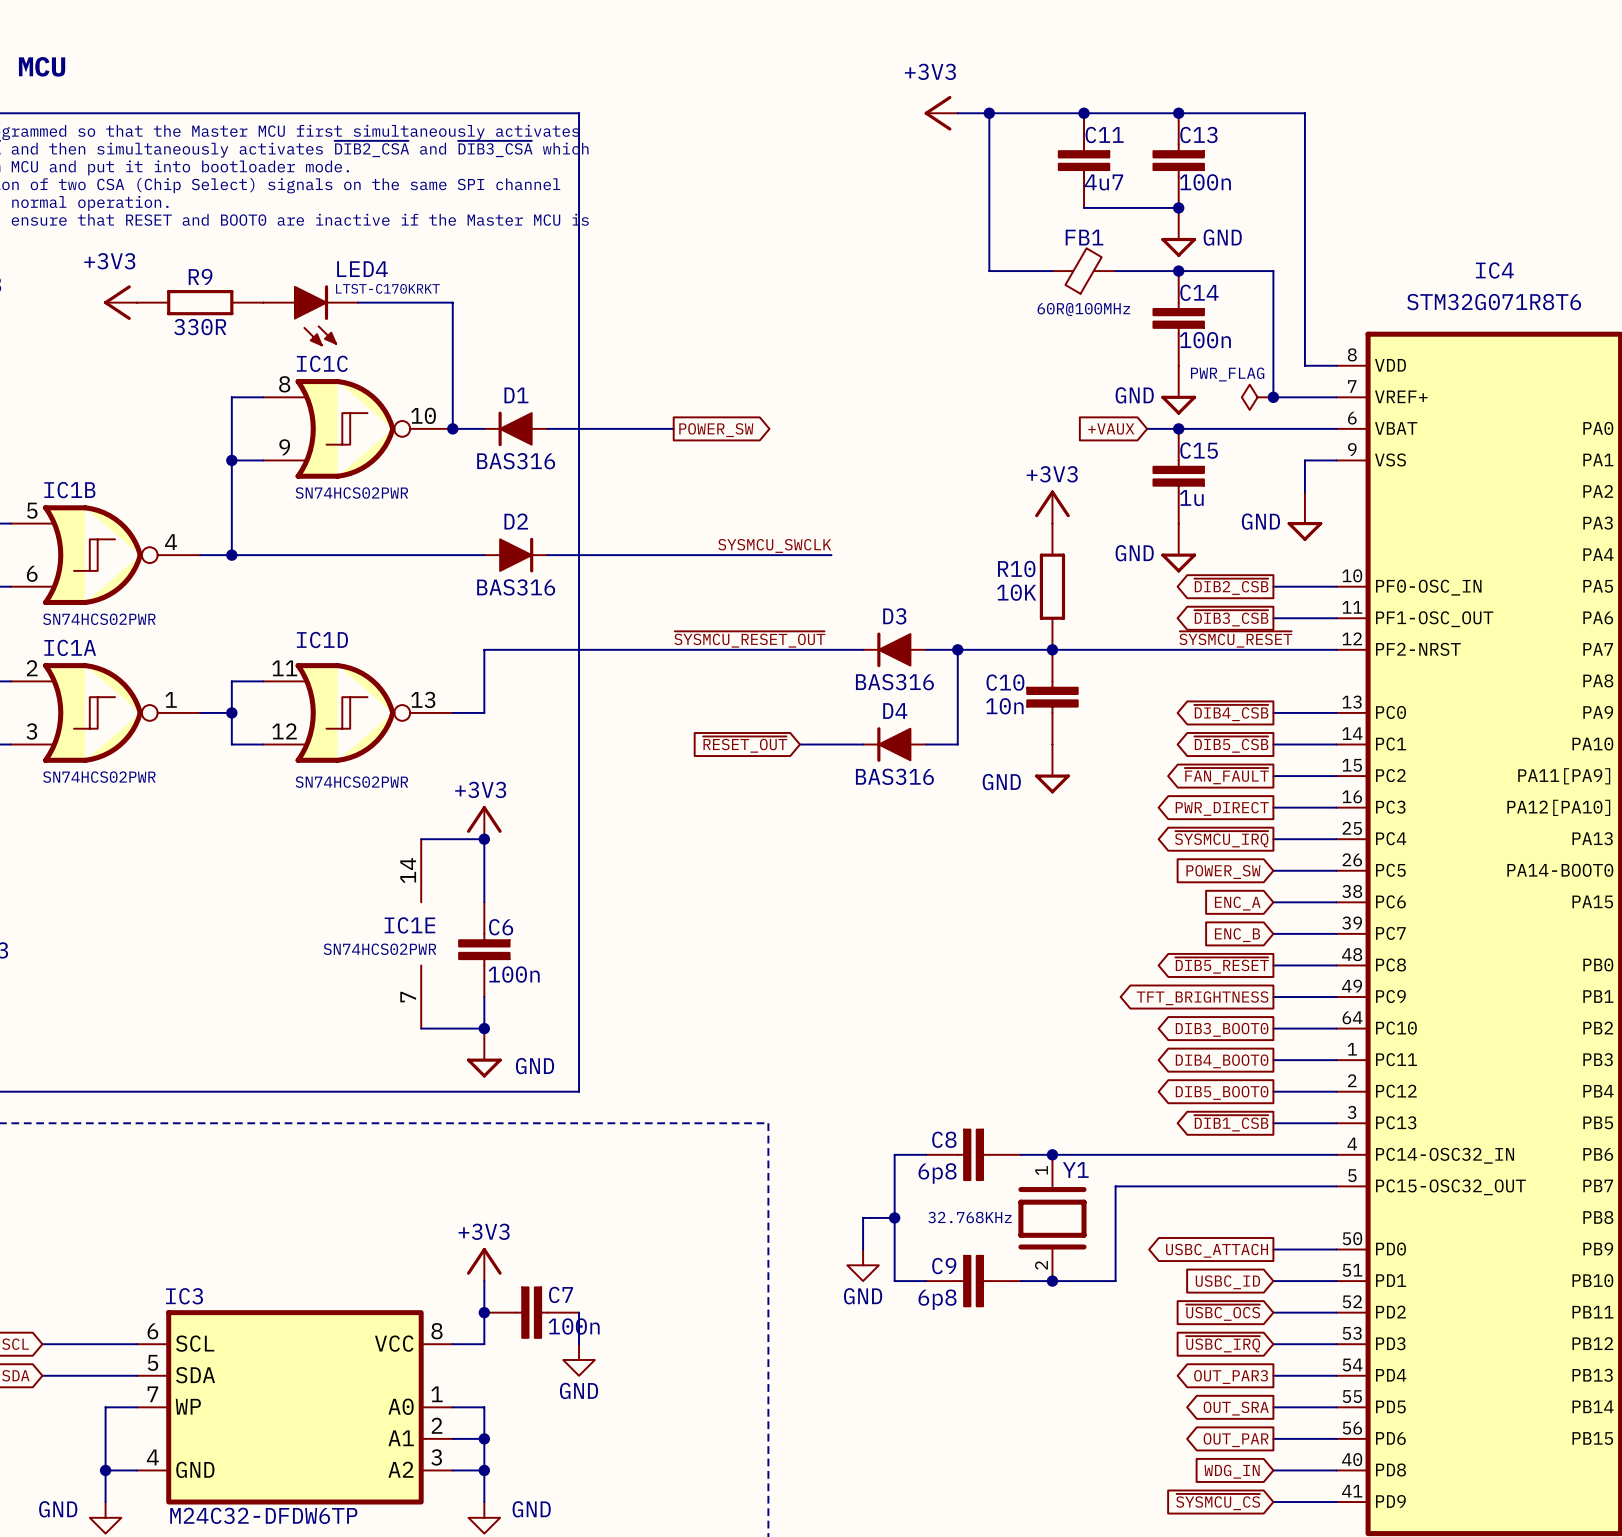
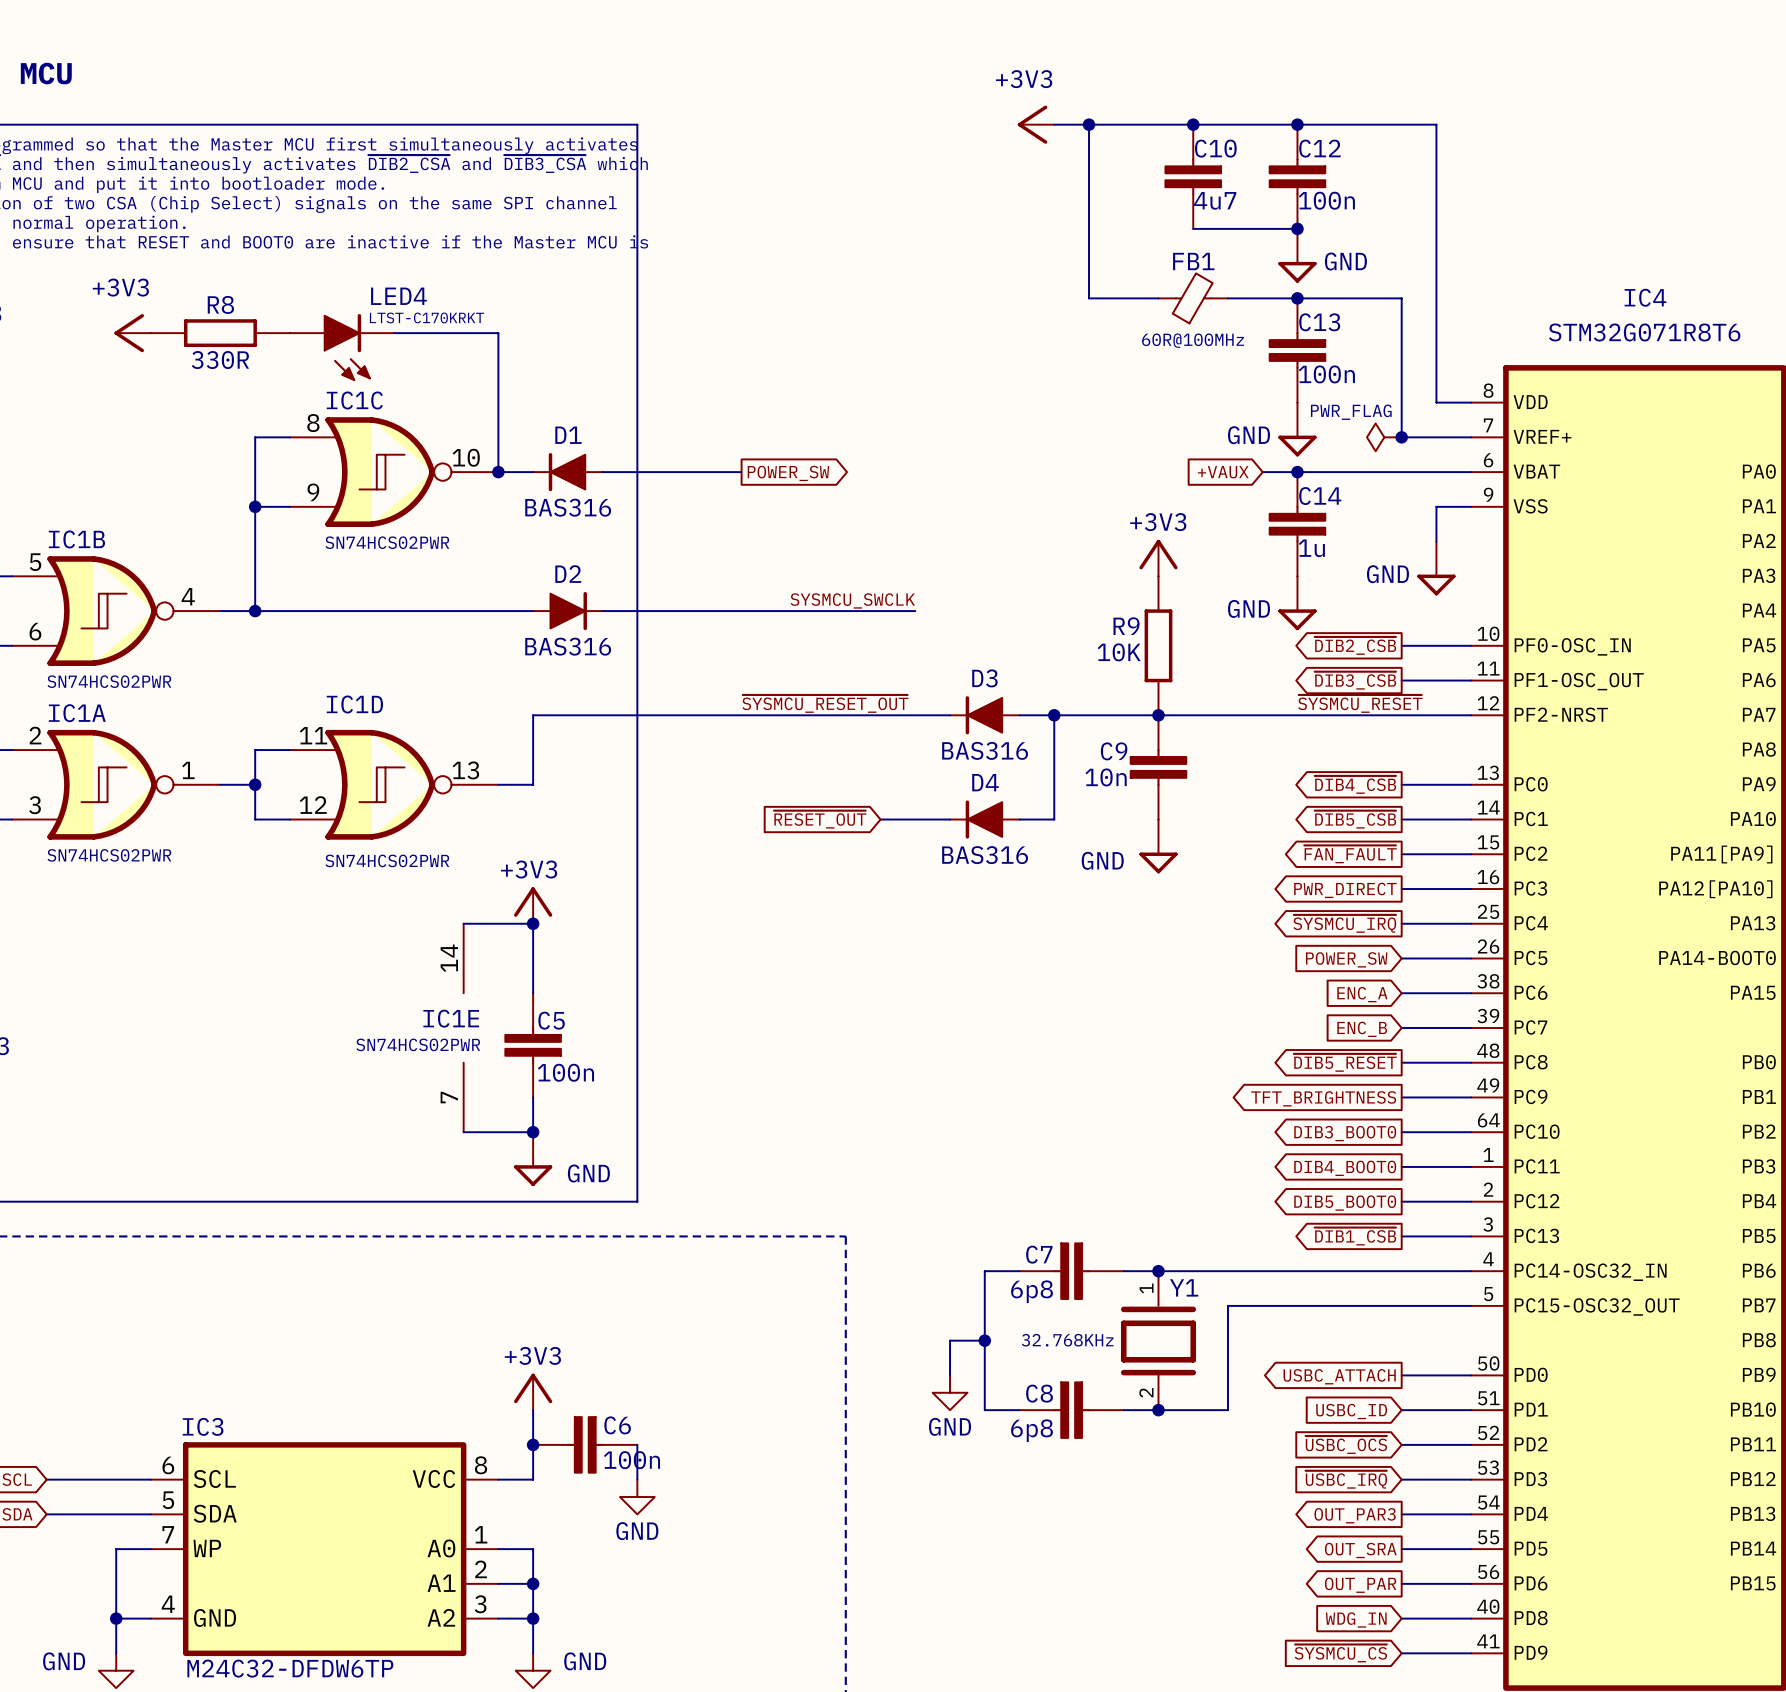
C11 name: C11 (1104, 135) -> C10 (1215, 148)
C13 name: C13 (1198, 135) -> C12 (1319, 148)
R9 name: R9 (200, 276) -> R8 (220, 304)
C14 name: C14 (1199, 292) -> C13 (1319, 322)
C15 name: C15 (1199, 450) -> C14 (1320, 496)
R10 name: R10 (1016, 568) -> R9 (1126, 626)
C10 name: C10 (1005, 682) -> C9 (1114, 751)
C6 name: C6 (501, 927) -> C5 (551, 1020)
C8 name: C8 (944, 1139) -> C7 (1039, 1254)
C9 name: C9 (944, 1266) -> C8 (1039, 1393)
C7 name: C7 (561, 1294) -> C6 (617, 1425)

